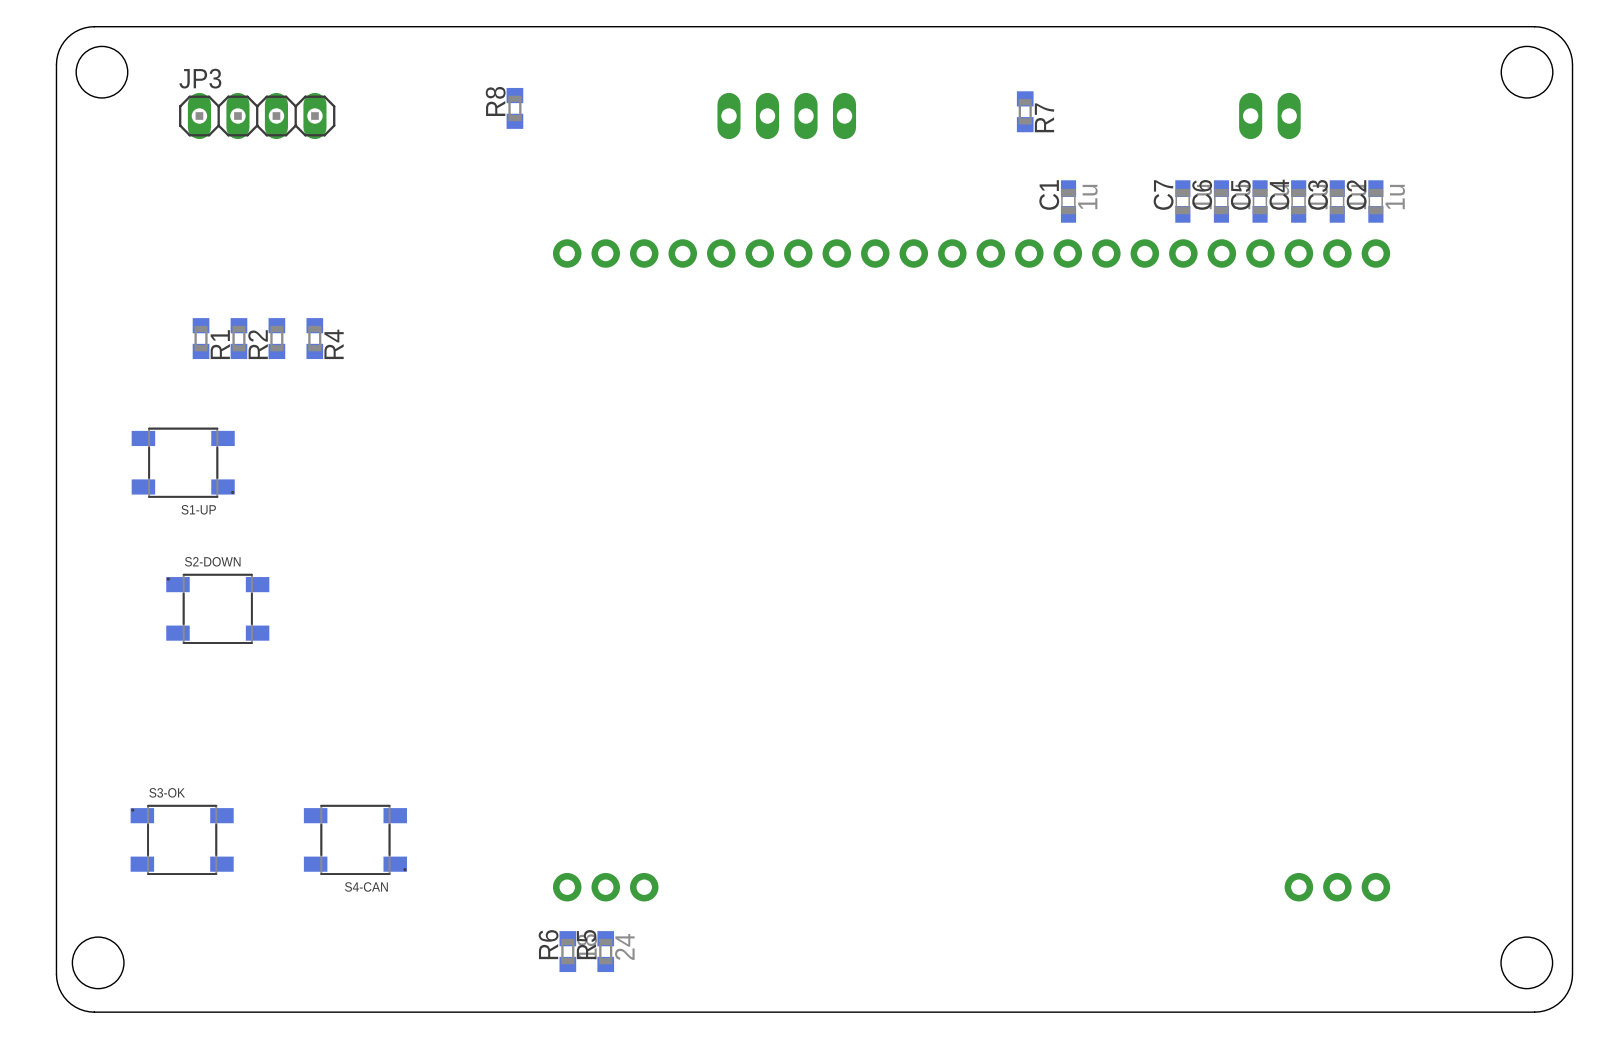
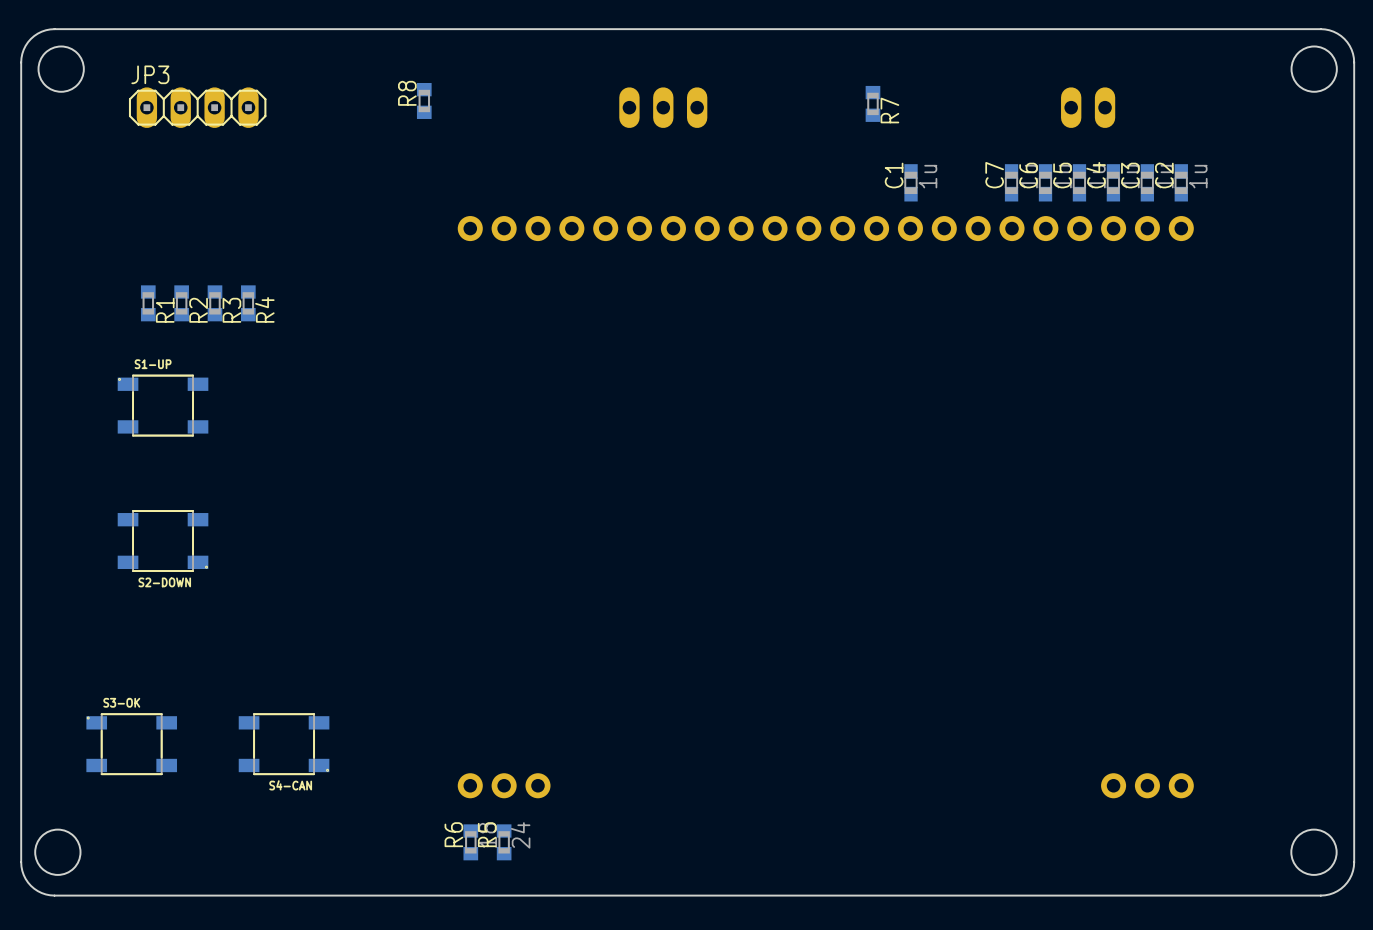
part footprint: [717, 92, 857, 140] -> [619, 87, 708, 128]
R3 name: none -> R3 (231, 310)
S1-UP rotation: 0° (183, 462) -> 180° (163, 405)
S2-DOWN rotation: 0° (217, 608) -> 180° (163, 541)

